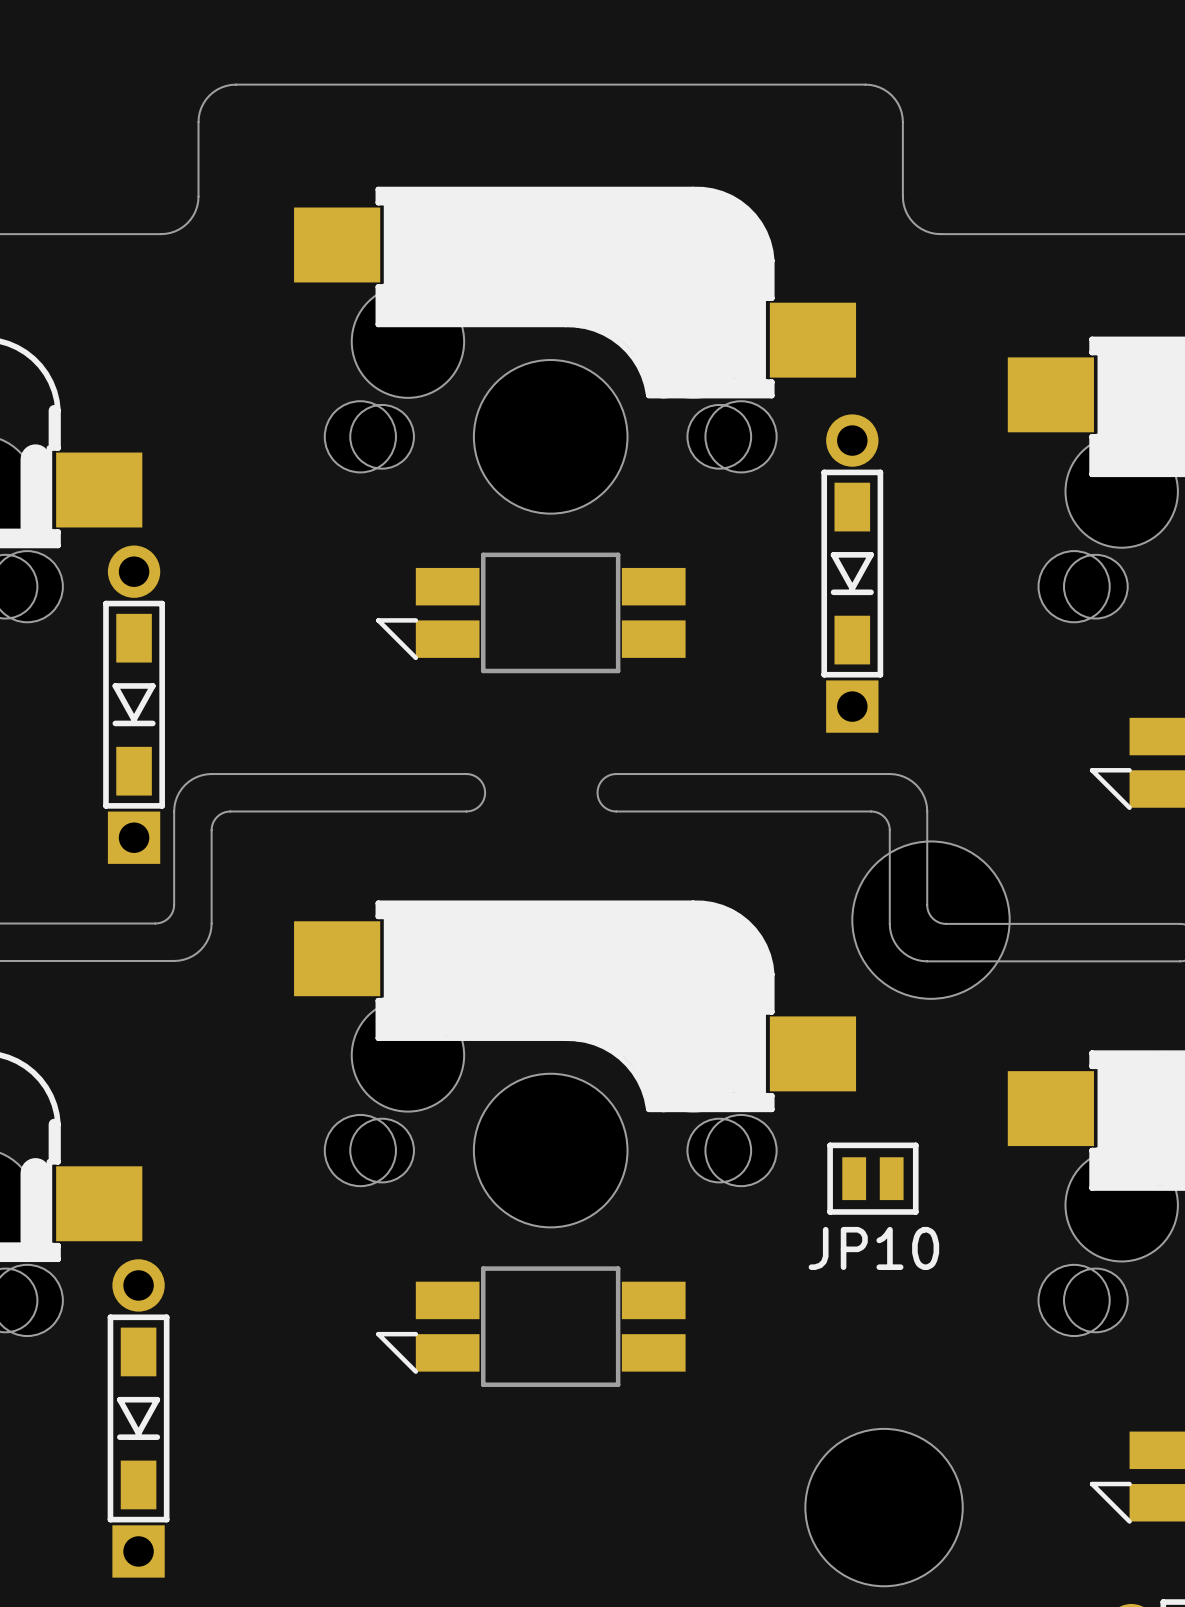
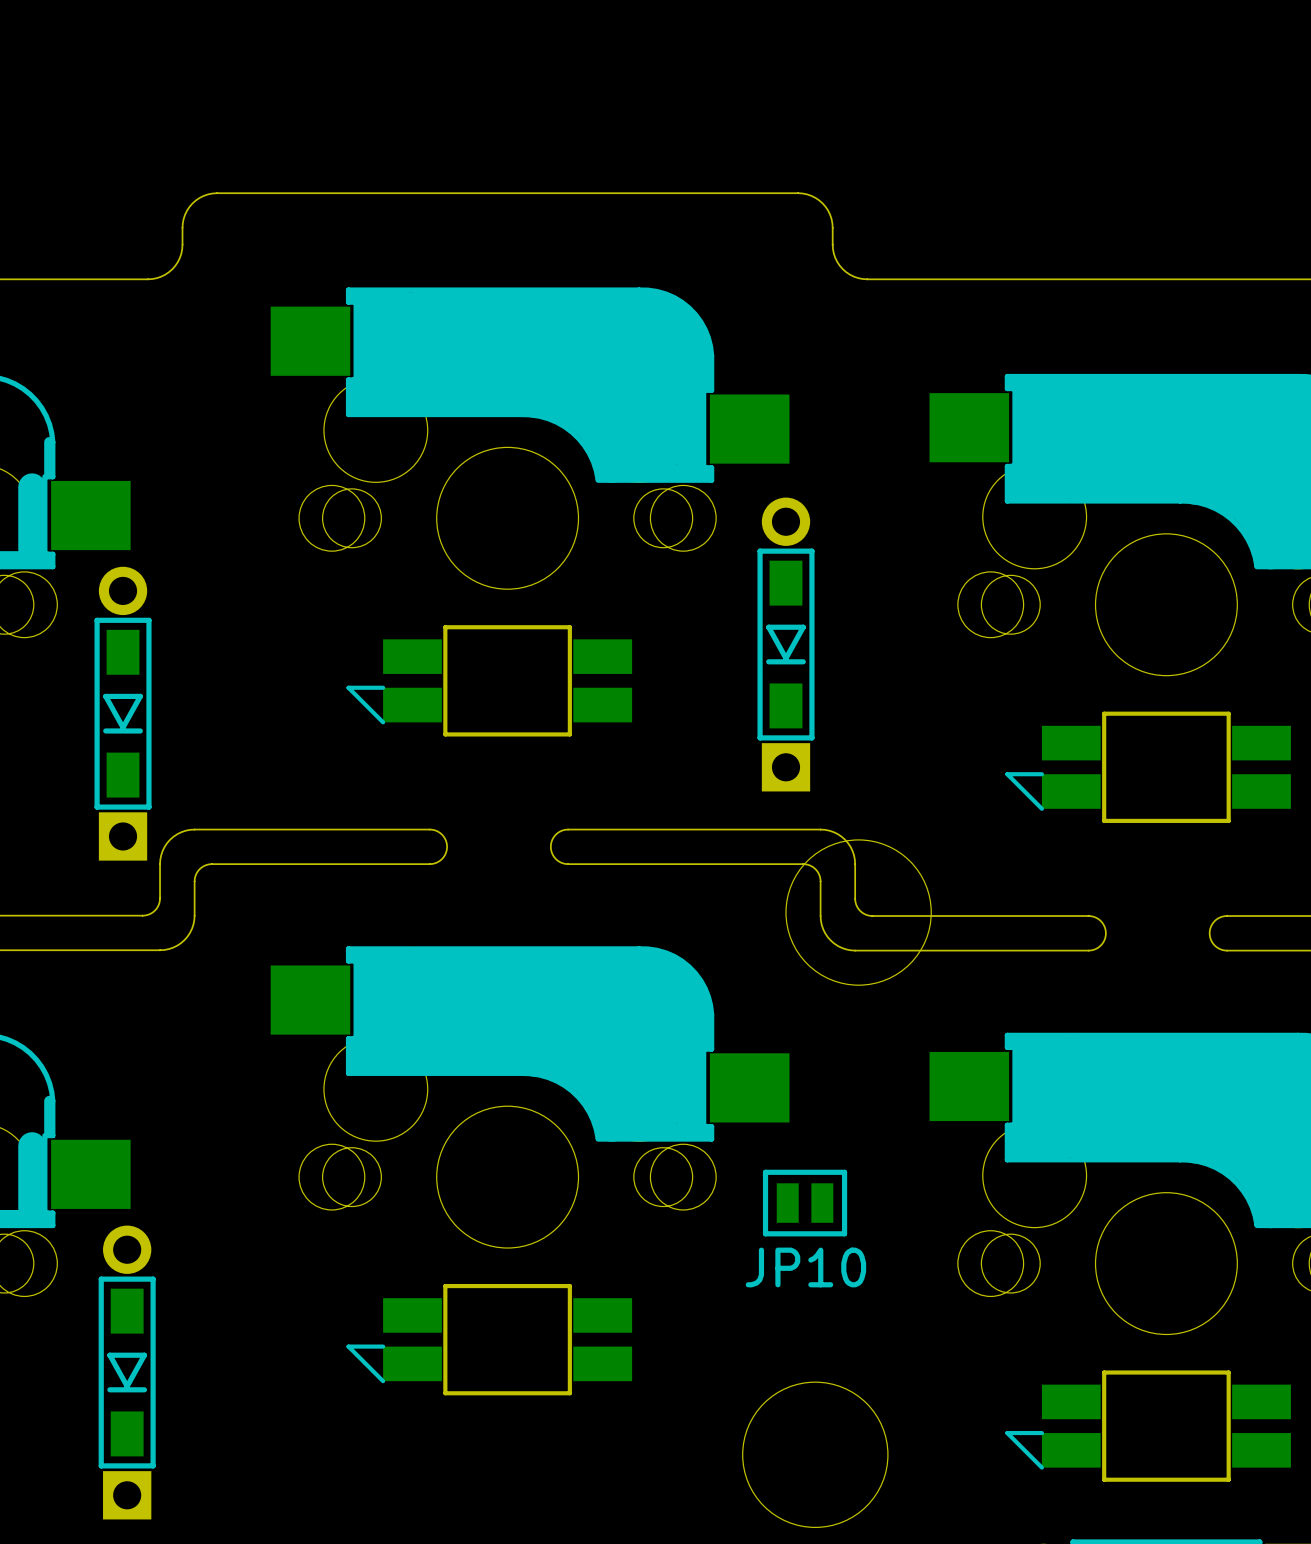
board edge: (902, 178) (902, 122) (900, 107) (888, 92) (875, 85) (865, 84) (231, 84) (213, 92) (201, 107) (198, 122) (198, 178) -> (832, 227) (830, 214) (822, 203) (811, 195) (798, 193) (217, 193) (203, 195) (192, 203) (185, 214) (182, 227)
part position: (575, 350) -> (530, 438)
part position: (852, 573) -> (786, 644)
part position: (530, 612) -> (489, 680)
board edge: (174, 867) (175, 801) (185, 784) (201, 775) (466, 774) (477, 777) (483, 785) (484, 795) (482, 802) (475, 808) (468, 811) (223, 812) (215, 818) (211, 827) (211, 886) -> (160, 864) (162, 850) (170, 839) (181, 832) (190, 829) (429, 829) (442, 834) (446, 844) (443, 857) (432, 863) (209, 864) (198, 870) (194, 881)
board edge: (927, 867) (925, 801) (916, 784) (899, 775) (616, 774) (604, 777) (598, 785) (597, 792) (600, 802) (604, 807) (613, 811) (878, 812) (885, 818) (889, 827) (889, 886) -> (855, 864) (852, 850) (845, 839) (833, 832) (820, 829) (568, 829) (555, 834) (550, 844) (554, 857) (565, 863) (805, 864) (817, 870) (820, 881)
part position: (575, 1063) -> (530, 1097)
part position: (872, 1178) -> (805, 1203)
part position: (530, 1326) -> (489, 1339)

